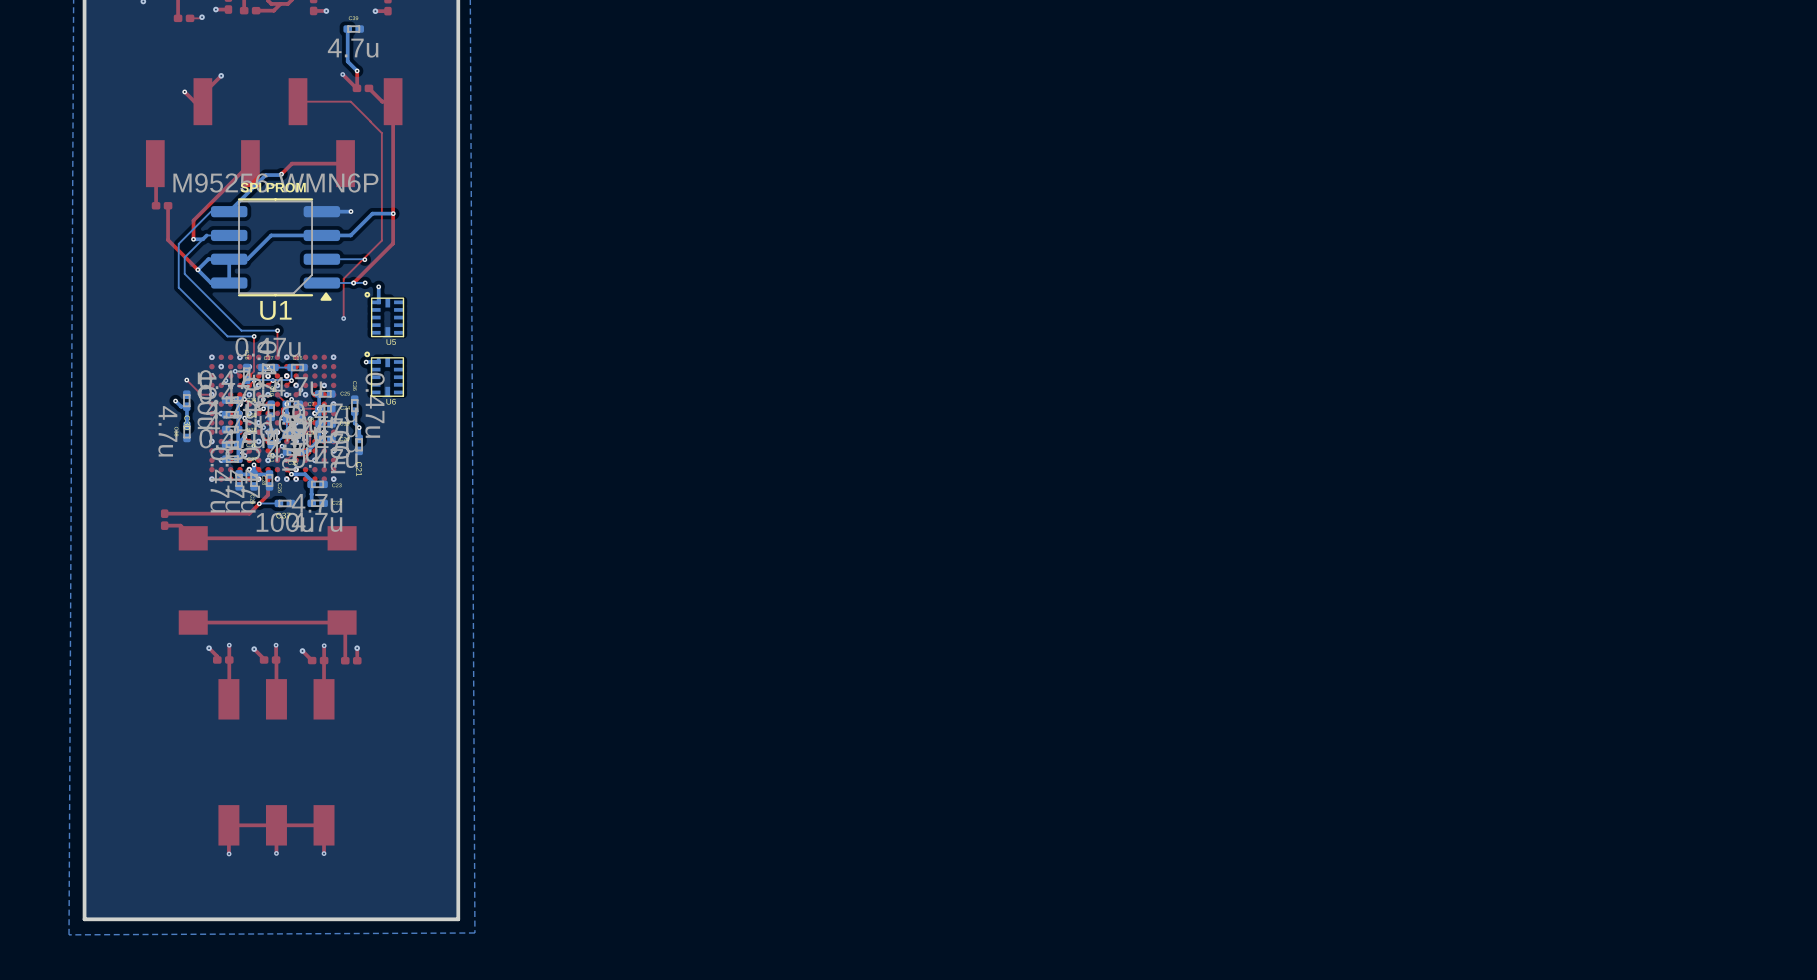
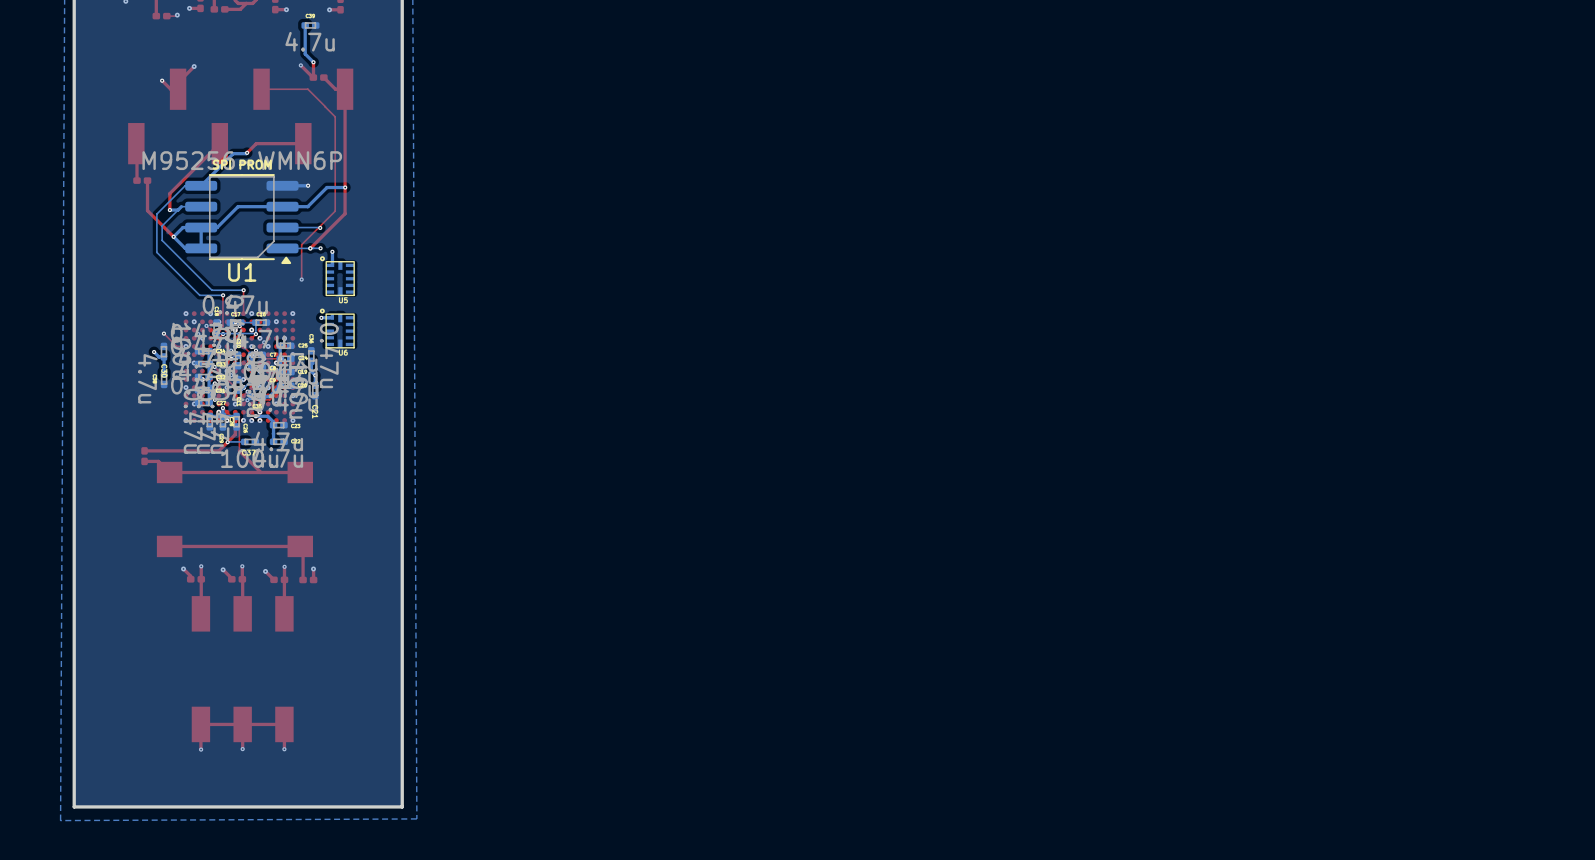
top track: none -> (235, 412) (239, 416) (239, 450) (260, 472) (300, 472)

